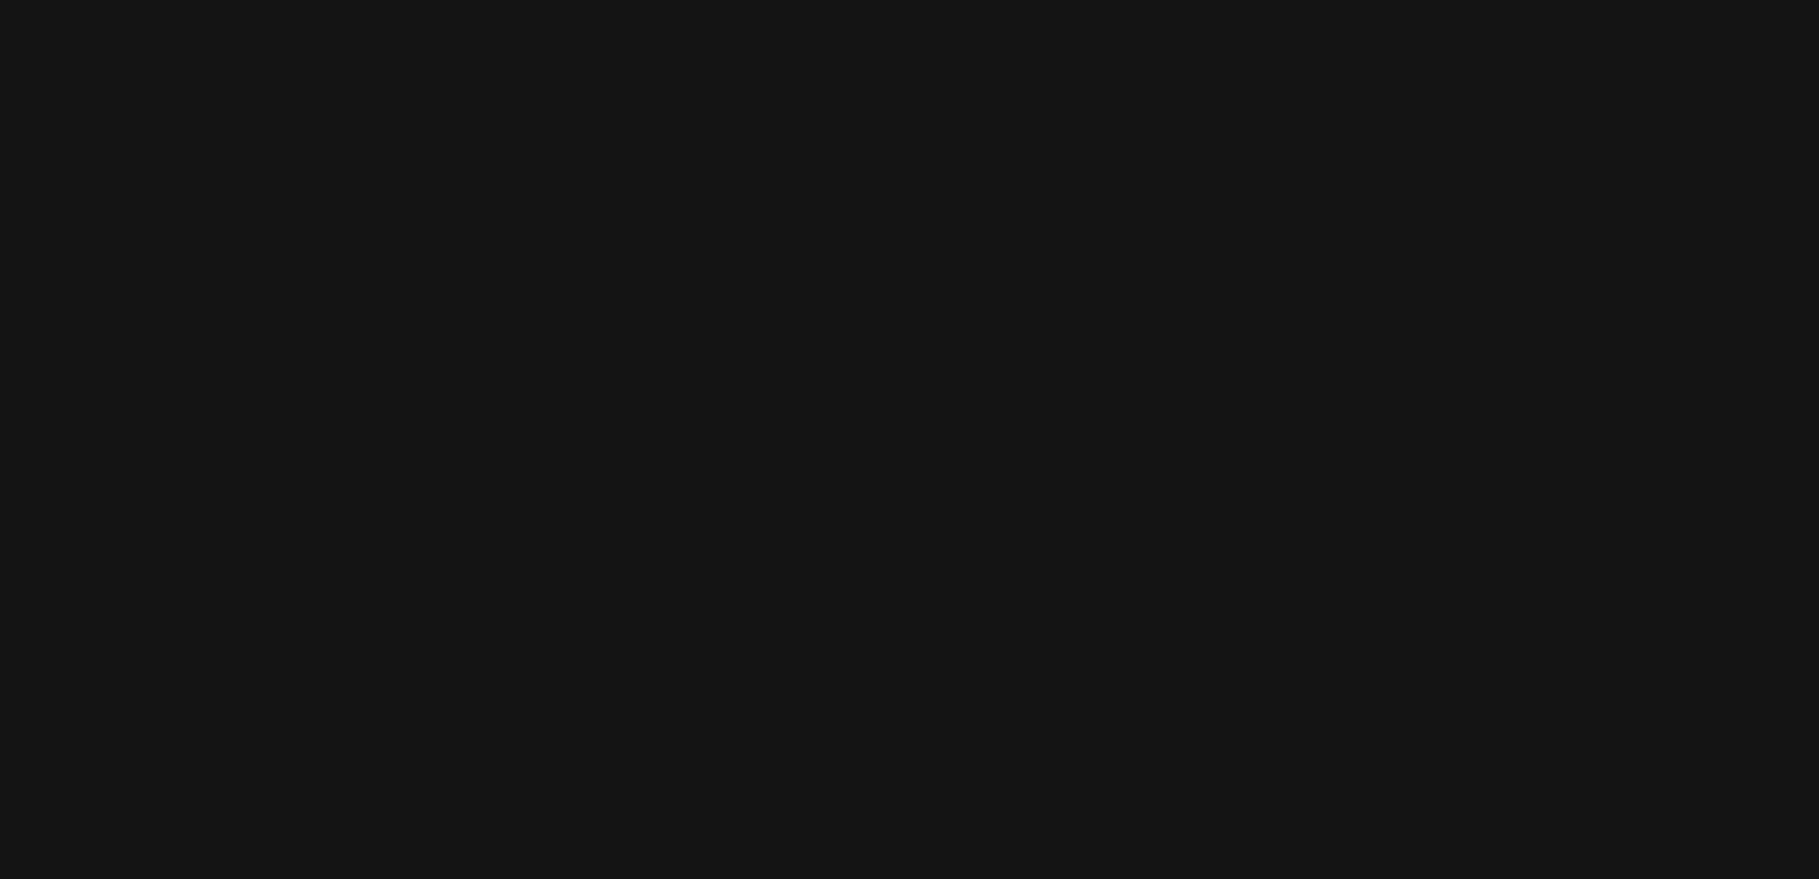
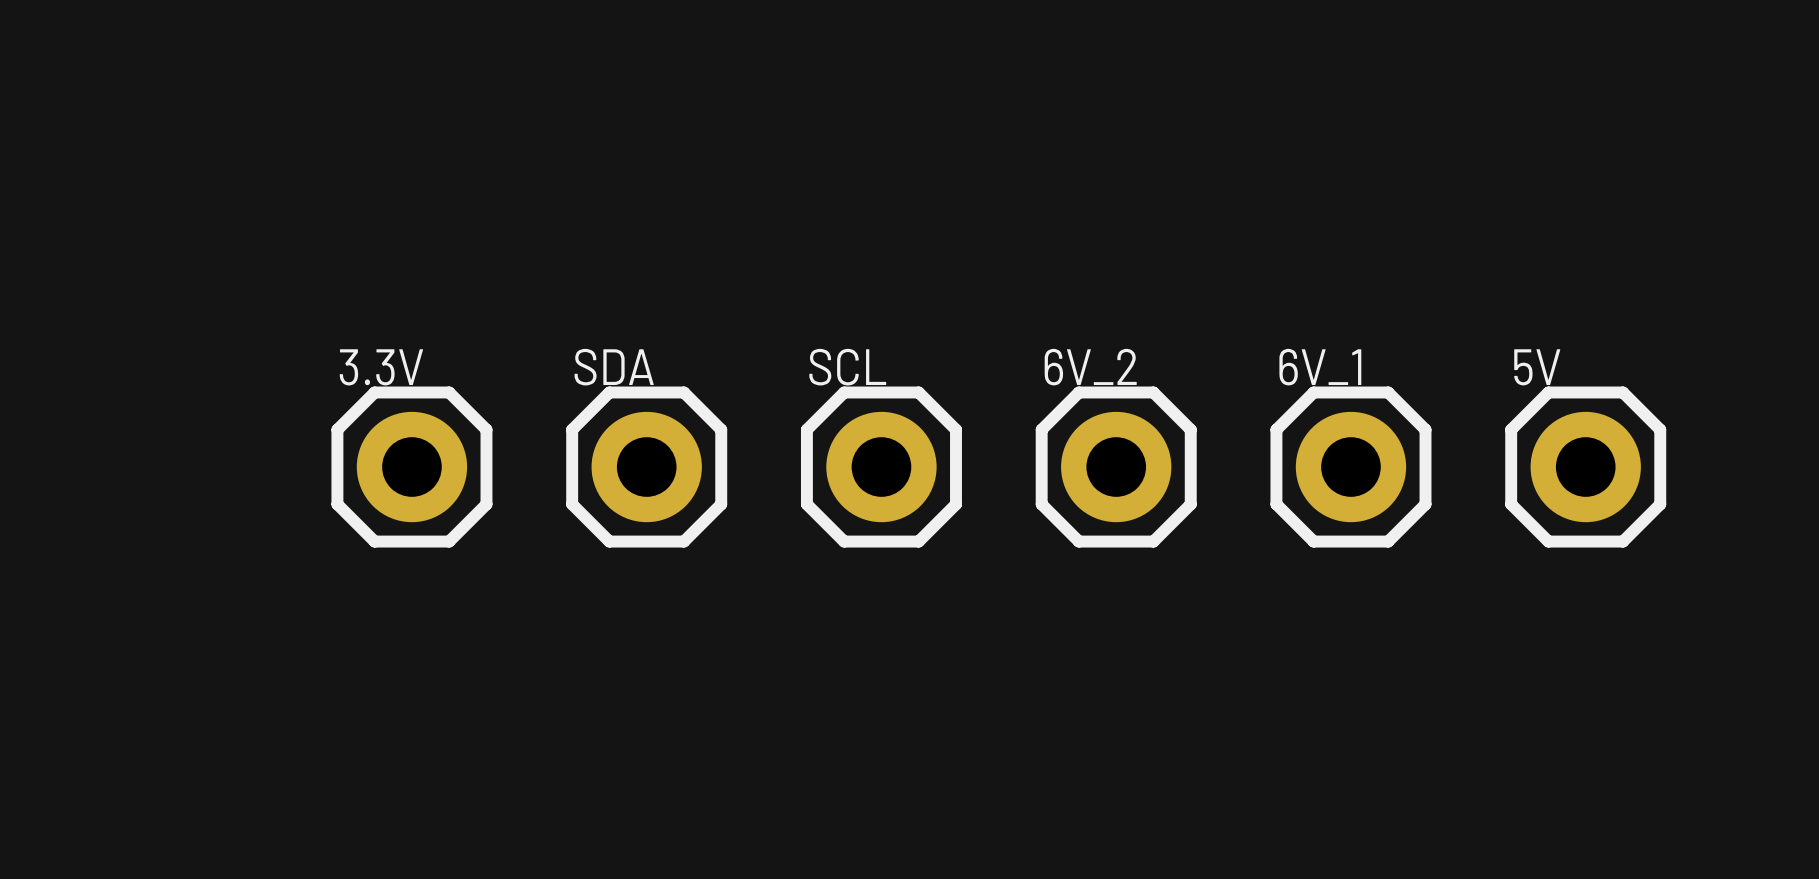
3.3V: none -> (411, 467)
SDA: none -> (646, 467)
SCL: none -> (881, 467)
6V_2: none -> (1116, 467)
6V_1: none -> (1350, 467)
5V: none -> (1585, 467)

